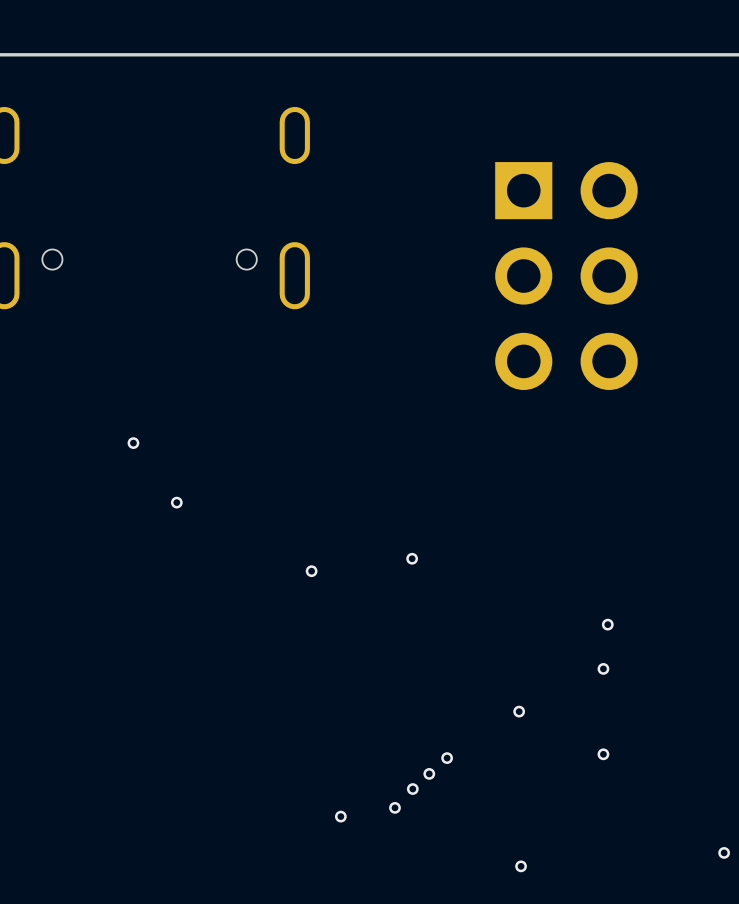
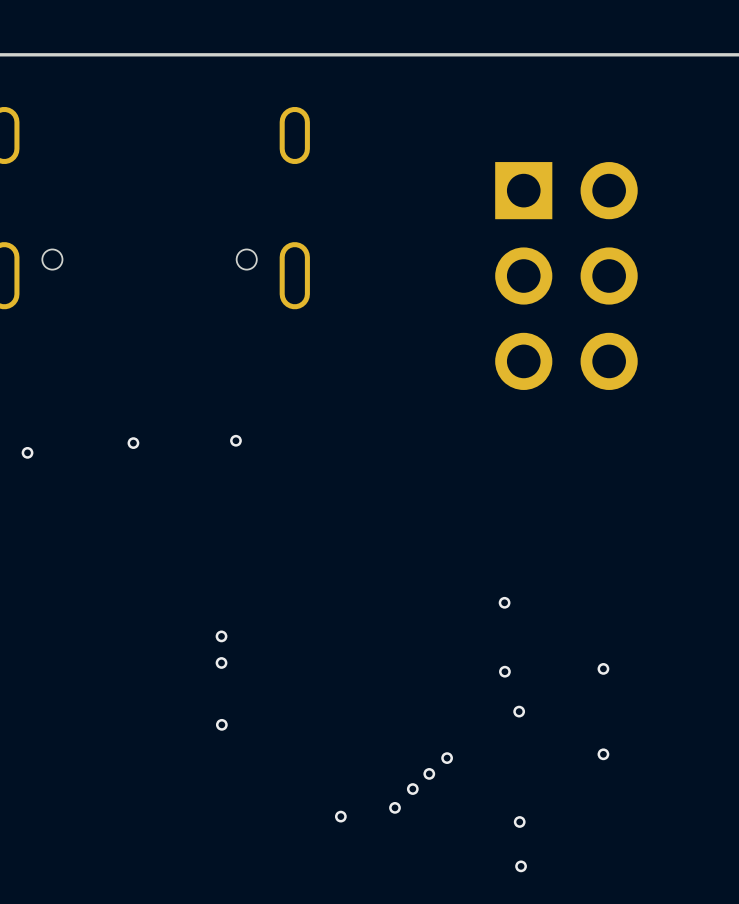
via: none -> (235, 440)
via: none -> (27, 452)
via: (176, 502) -> none
via: (412, 558) -> none
via: (311, 571) -> none
via: none -> (504, 602)
via: (607, 624) -> none
via: none -> (221, 636)
via: none -> (221, 662)
via: none -> (504, 671)
via: none -> (221, 724)
via: none -> (519, 821)
via: (724, 852) -> none

